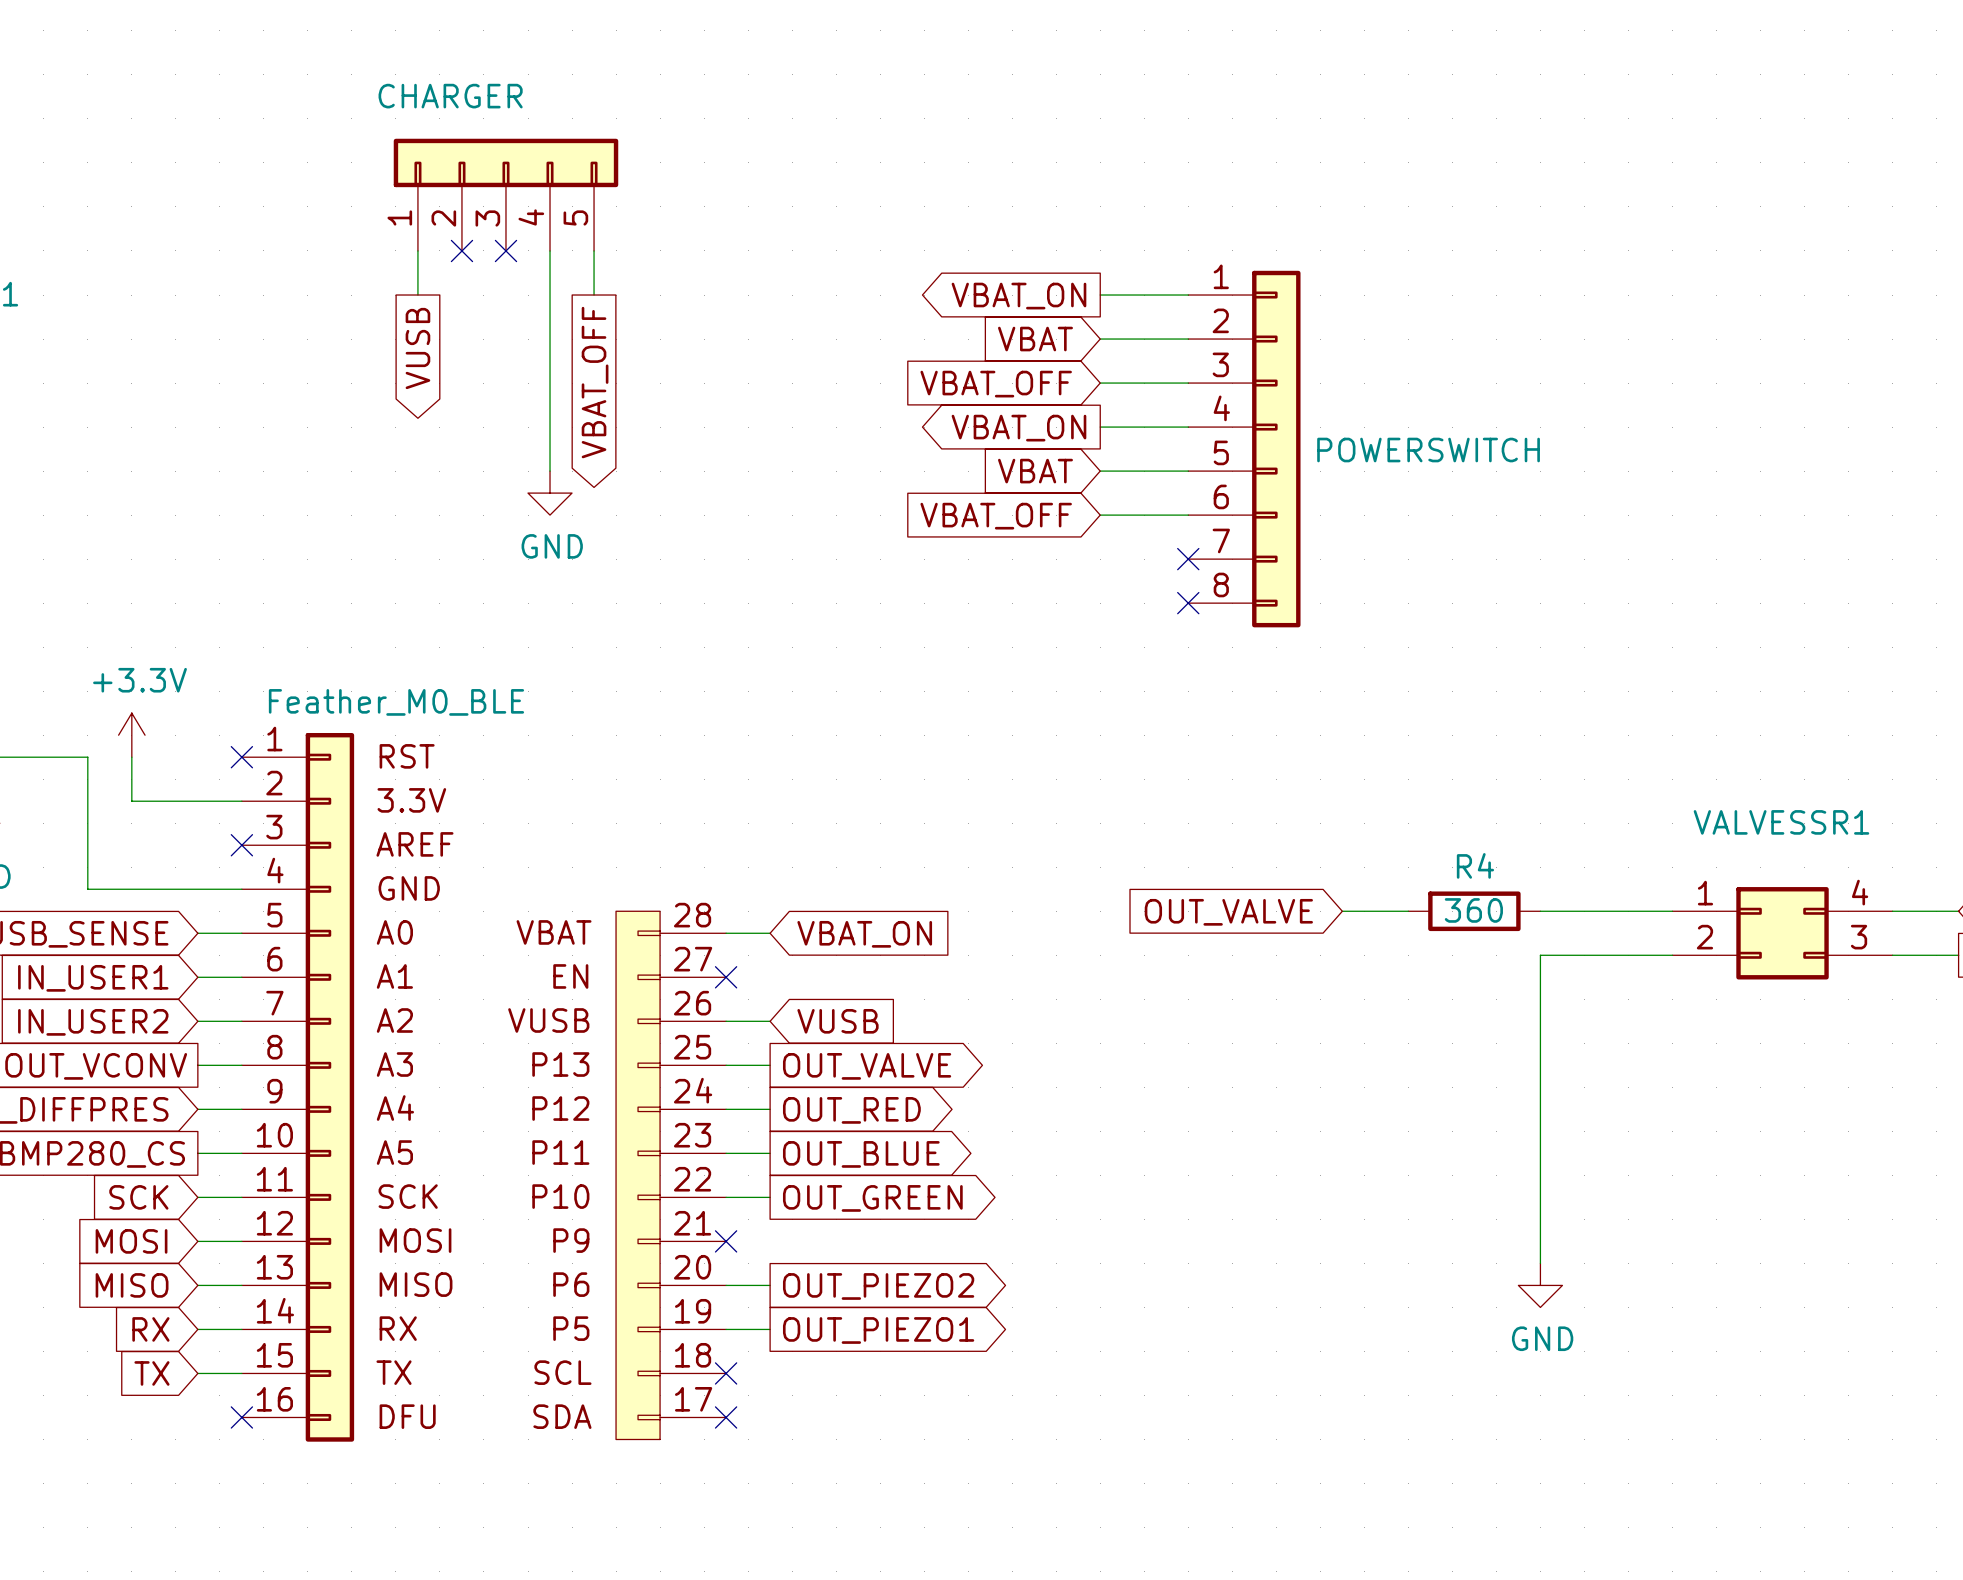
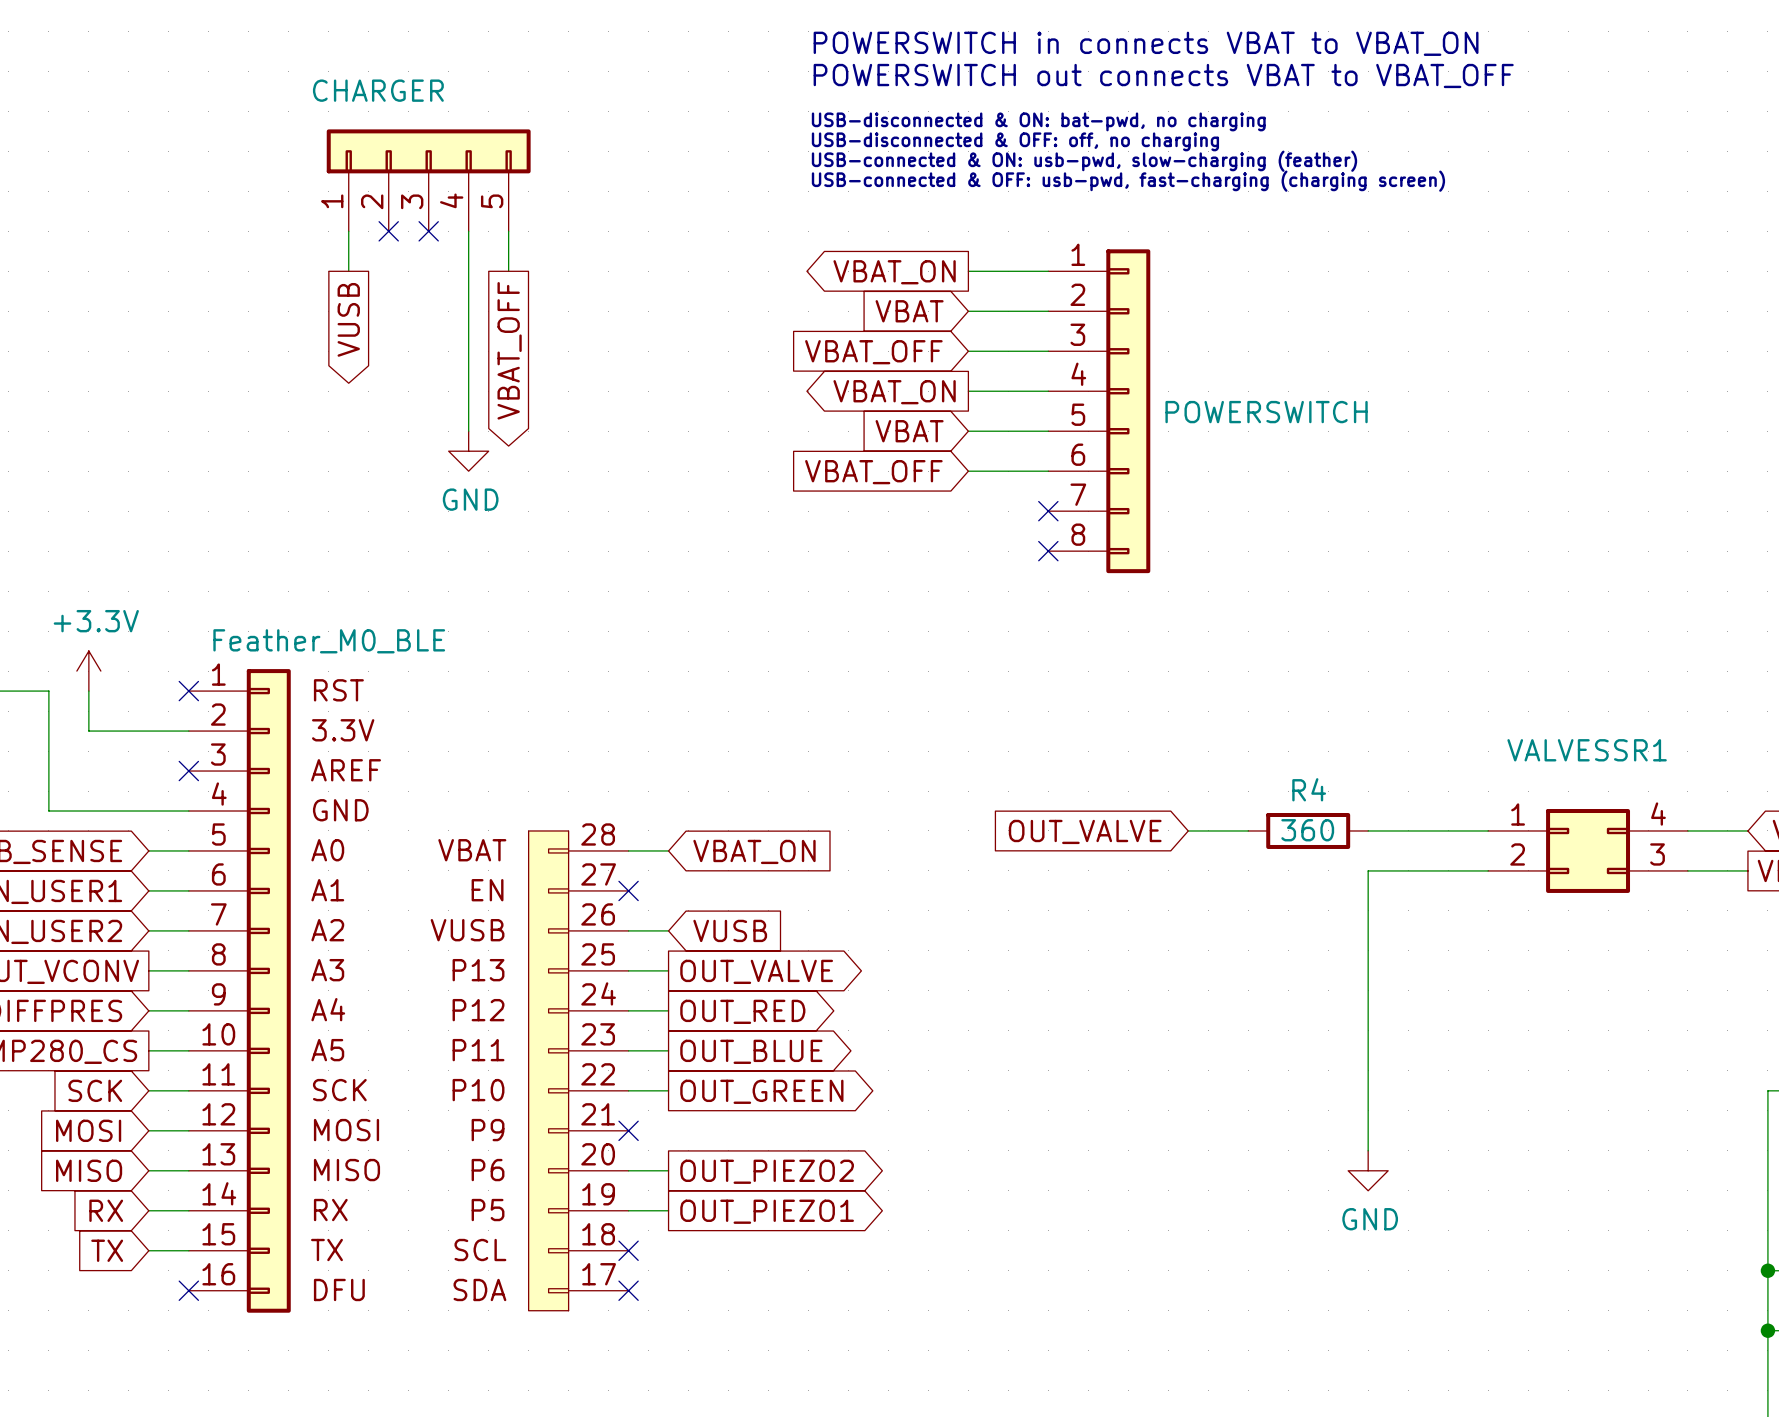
text: none -> POWERSWITCH in connects VBAT to VBAT_ON (1146, 43)
text: none -> POWERSWITCH out connects VBAT to VBAT_OFF (1163, 75)
text: none -> USB-disconnected & ON: bat-pwd, no charging (1038, 121)
text: none -> USB-disconnected & OFF: off, no charging (1015, 141)
text: none -> USB-connected & ON: usb-pwd, slow-charging (feather) (1084, 161)
text: none -> USB-connected & OFF: usb-pwd, fast-charging (charging screen) (1128, 181)

